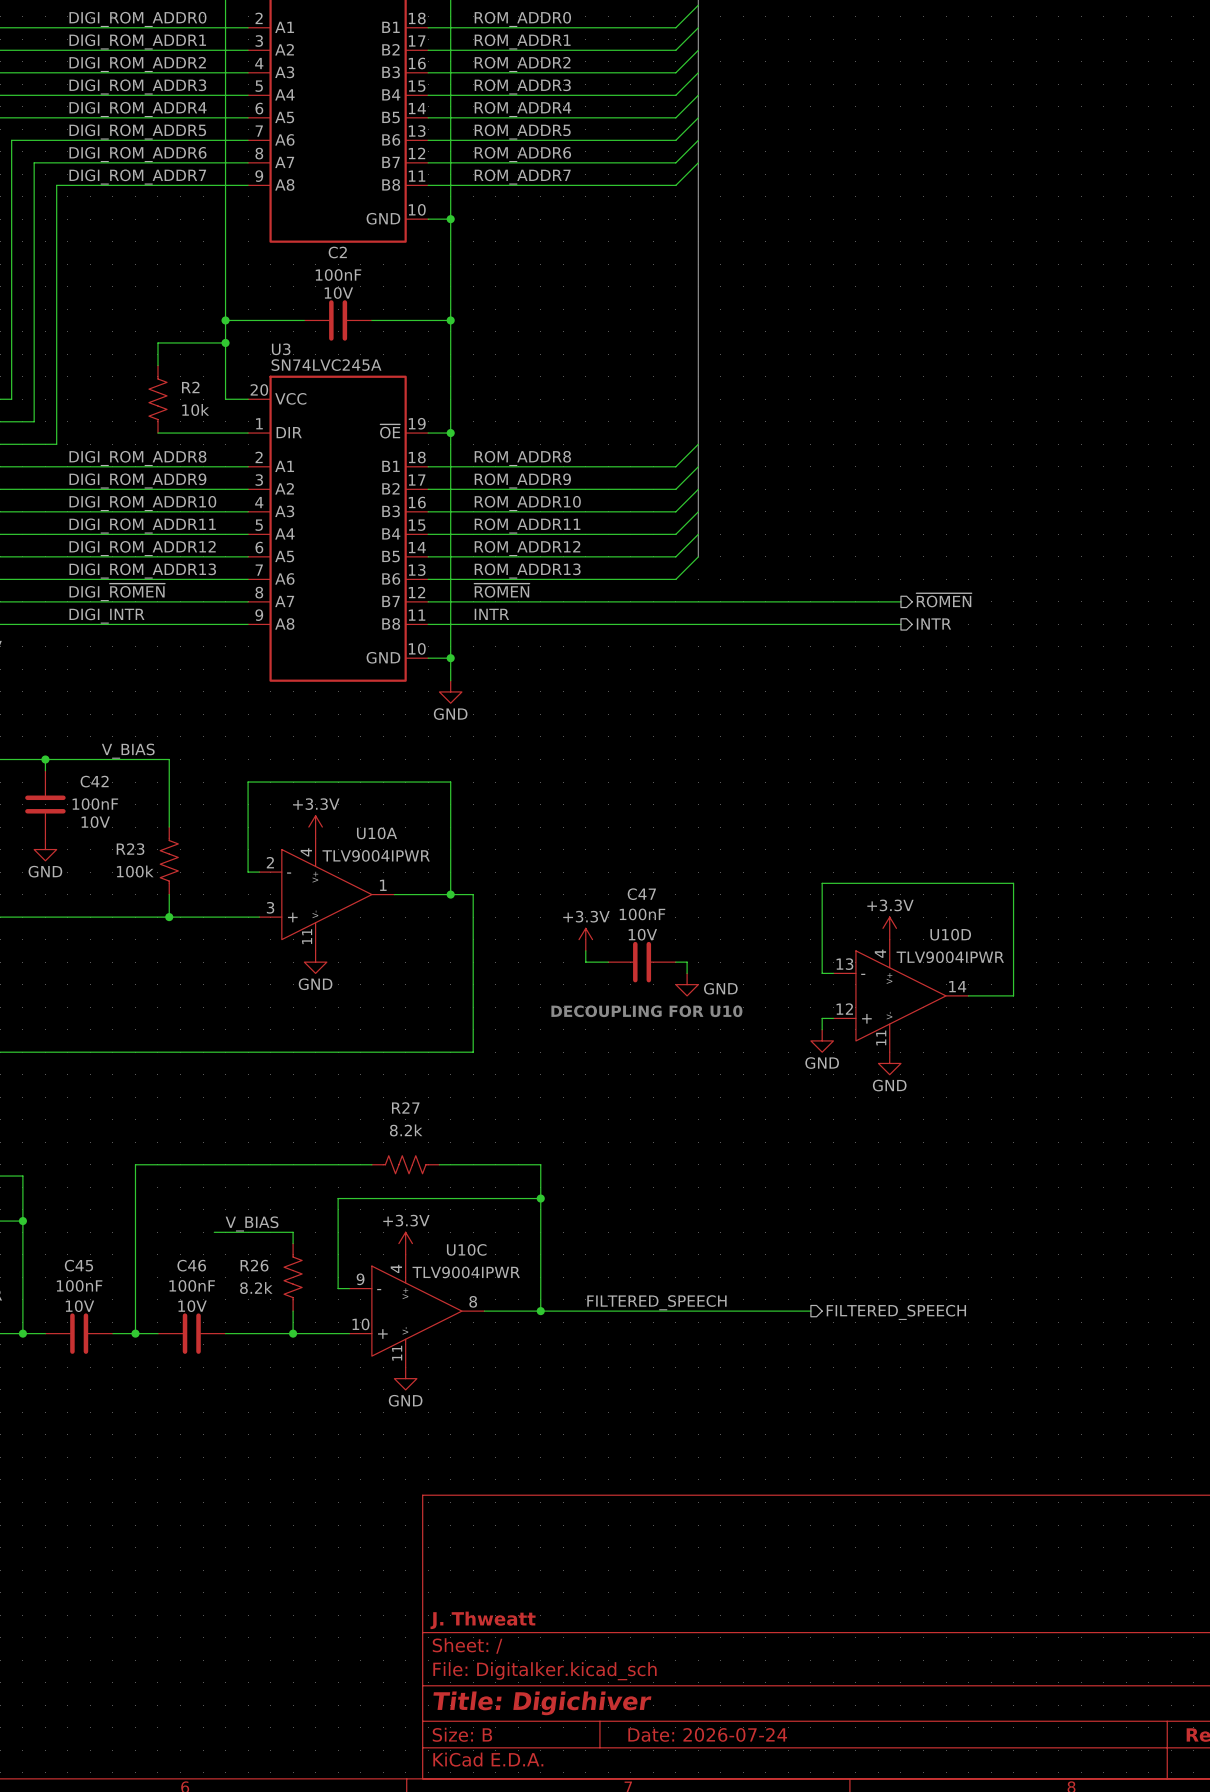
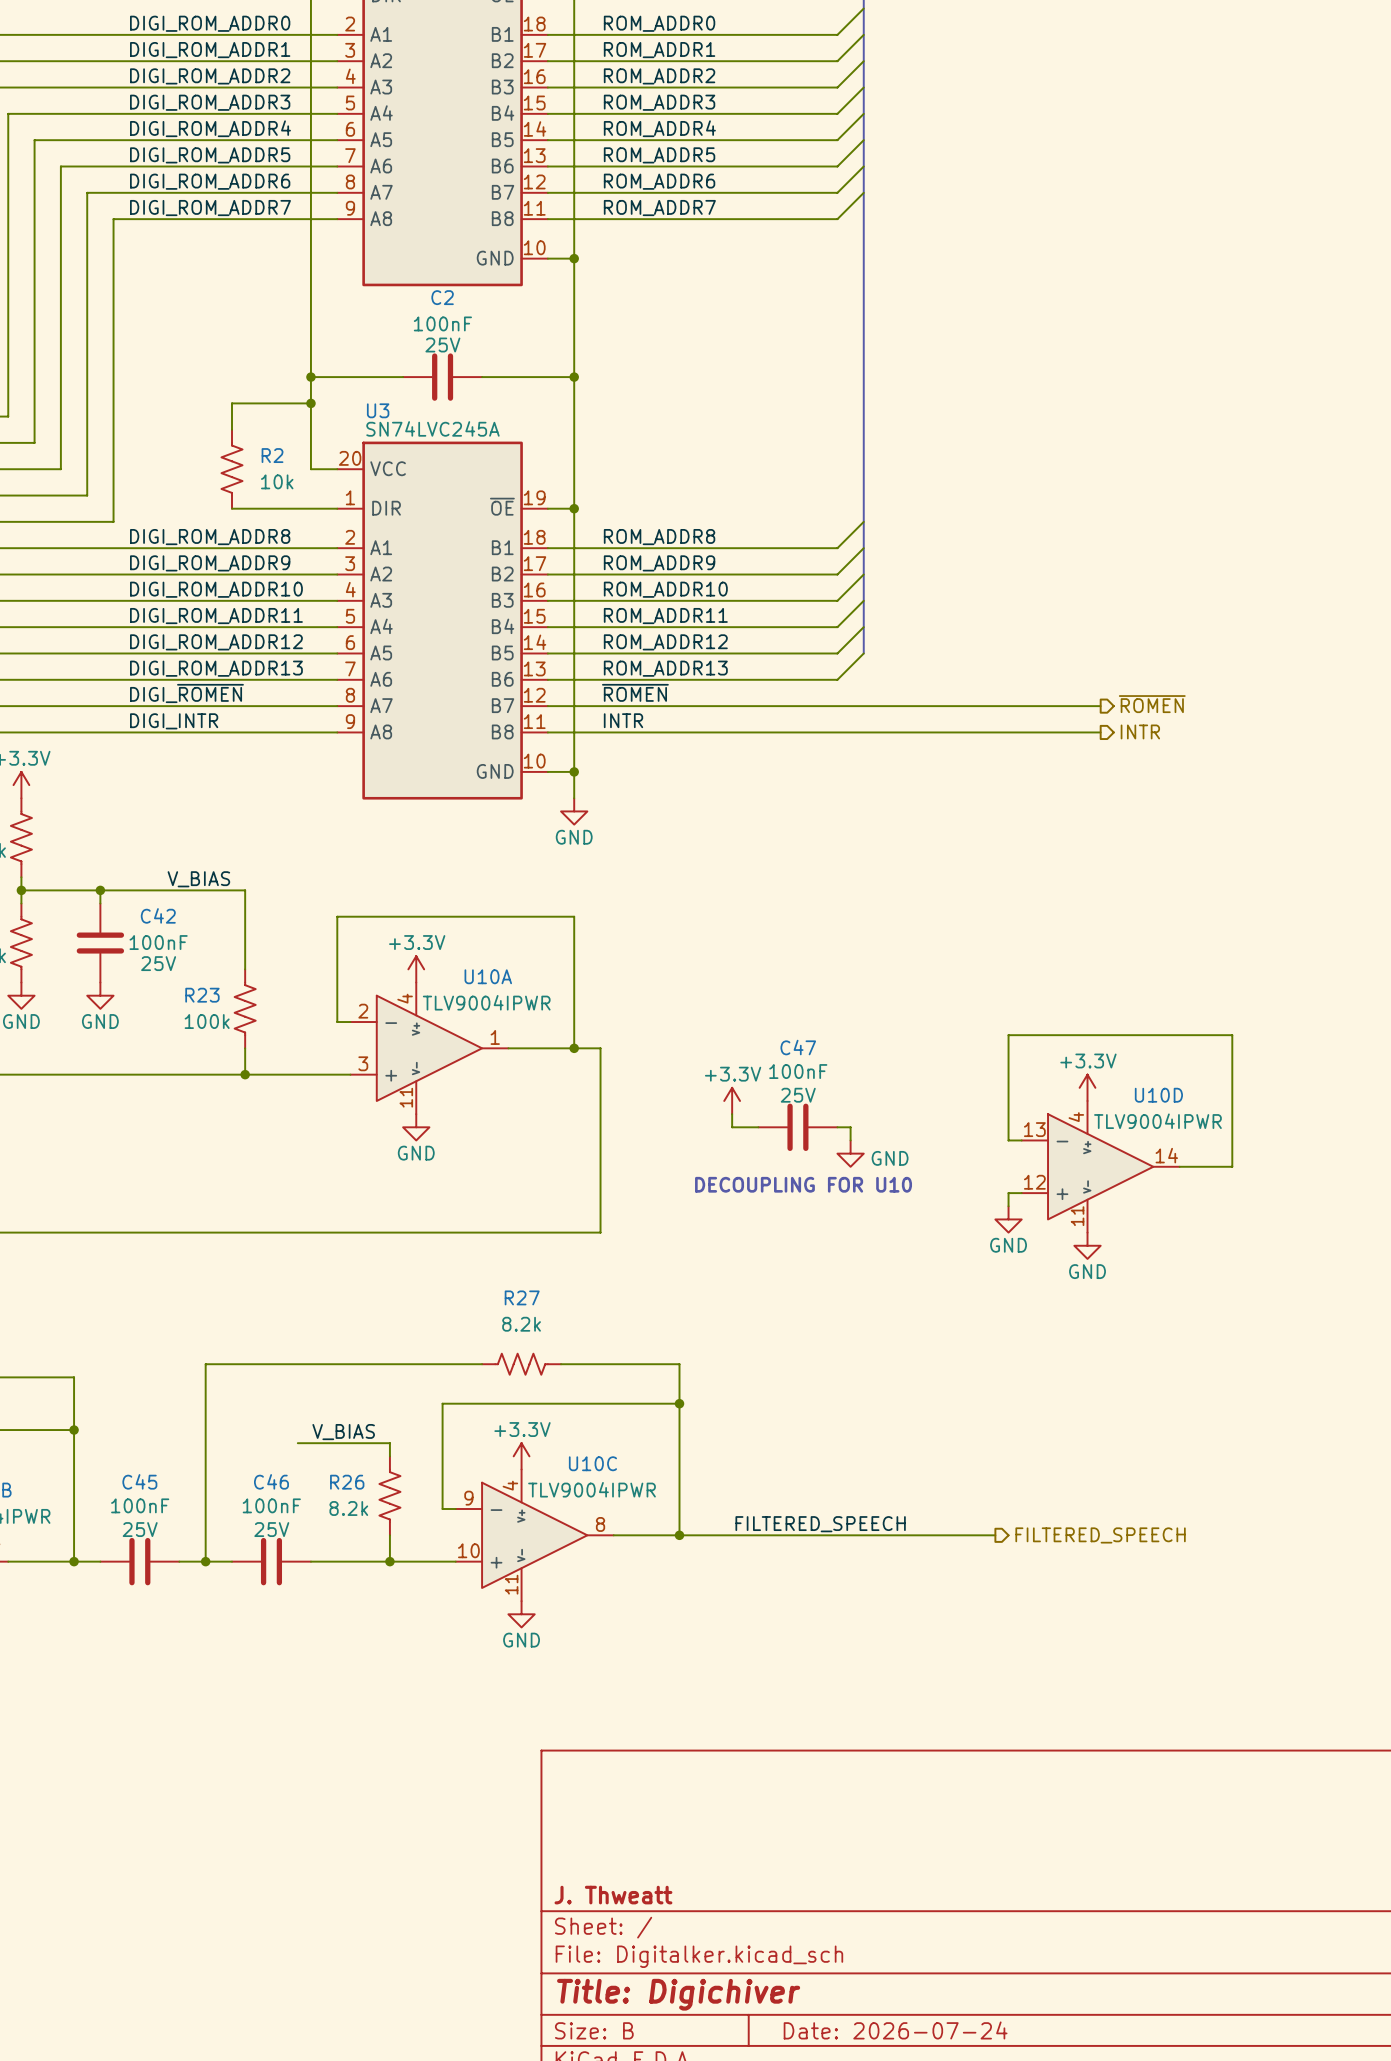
C2 text: 10V (338, 293) -> 25V (442, 345)
C42 text: 10V (95, 822) -> 25V (158, 963)
C47 text: 10V (642, 934) -> 25V (798, 1095)
C45 text: 10V (79, 1306) -> 25V (140, 1529)
C46 text: 10V (192, 1306) -> 25V (271, 1529)

